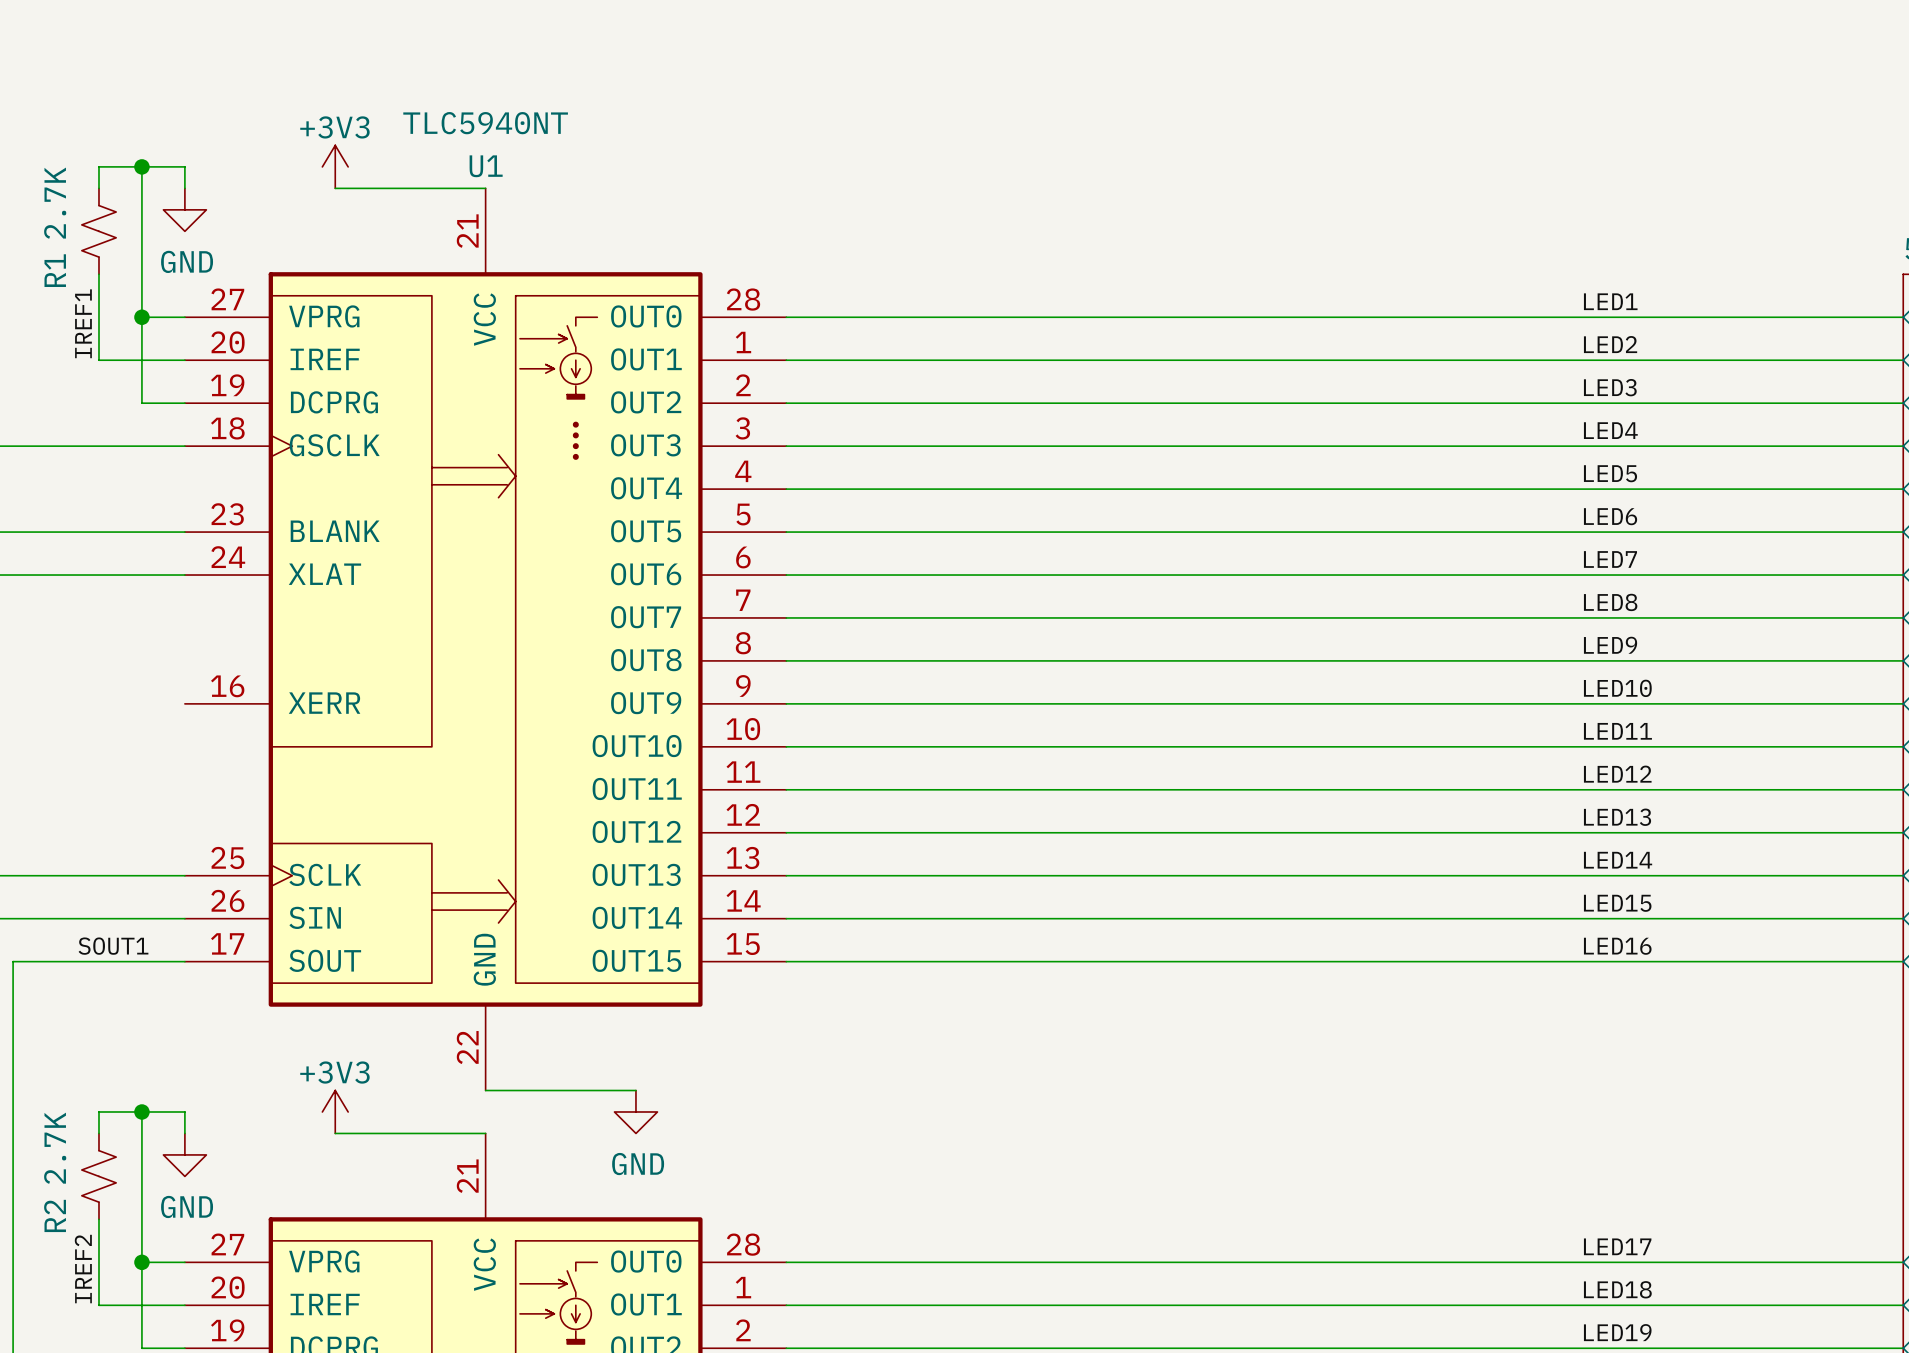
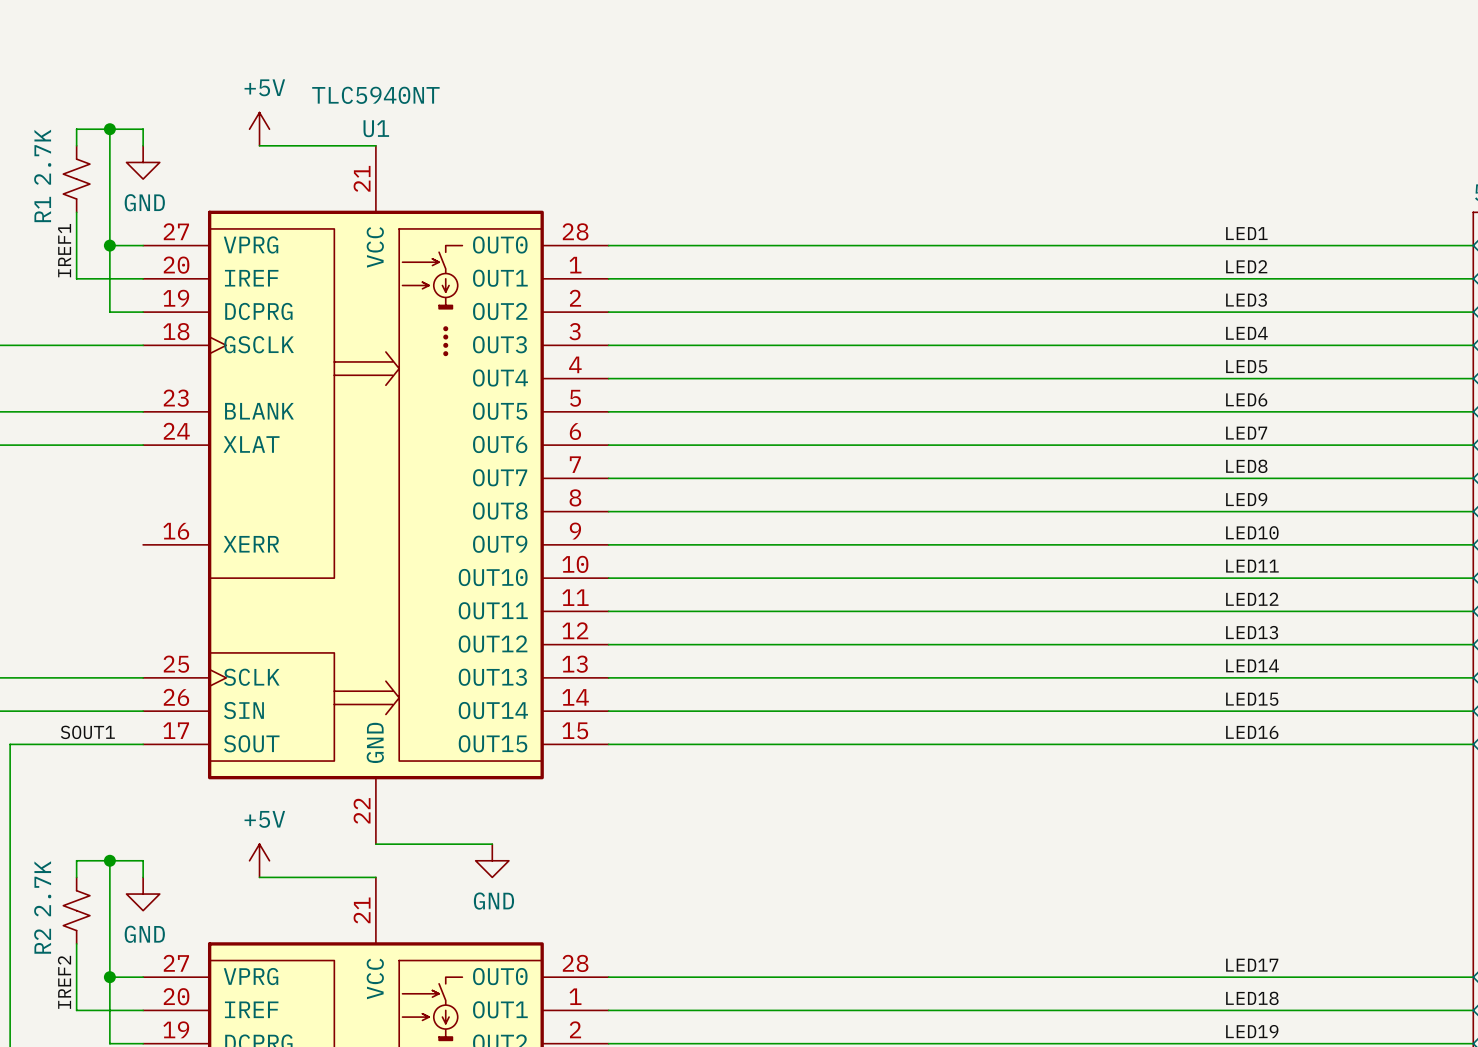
power symbol: +3V3 (335, 166) -> +5V (259, 129)
power symbol: +3V3 (335, 1111) -> +5V (259, 860)

